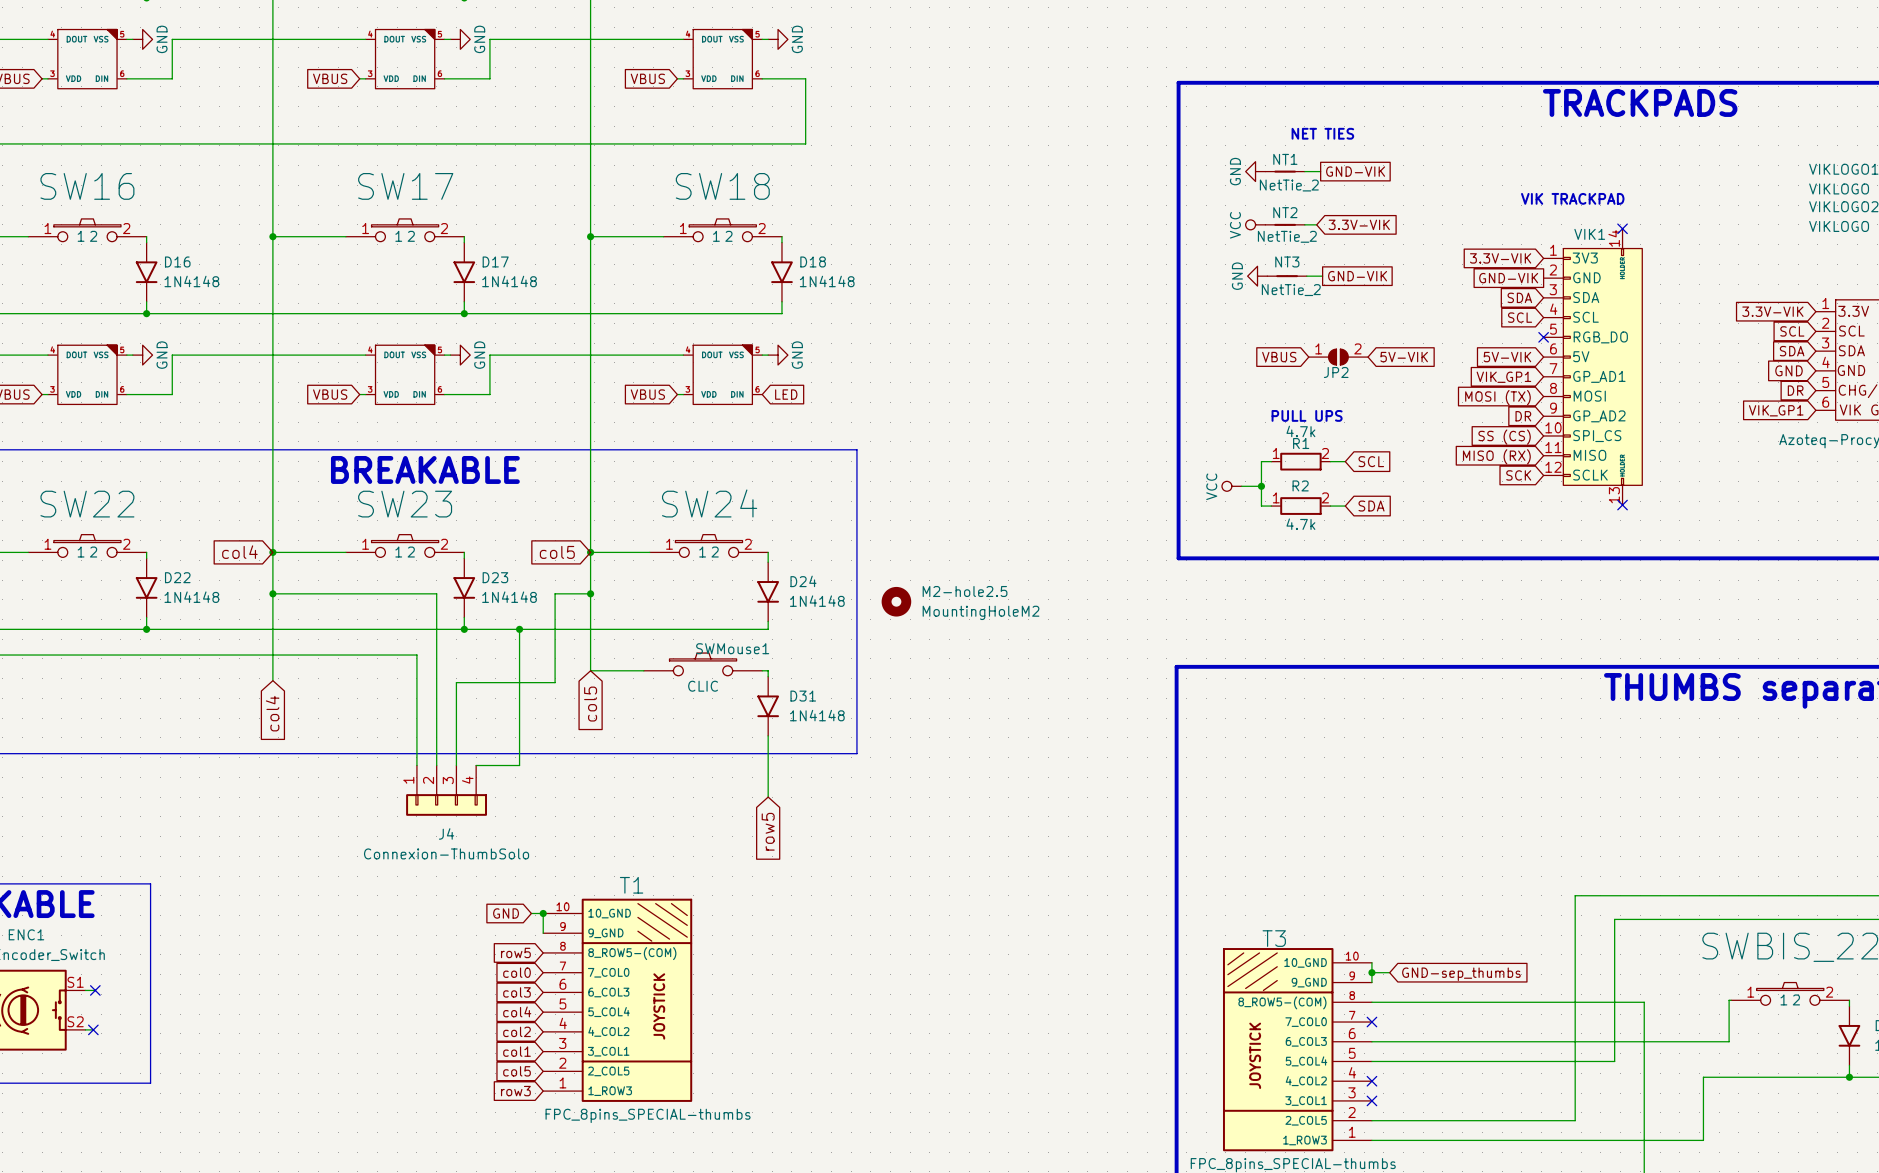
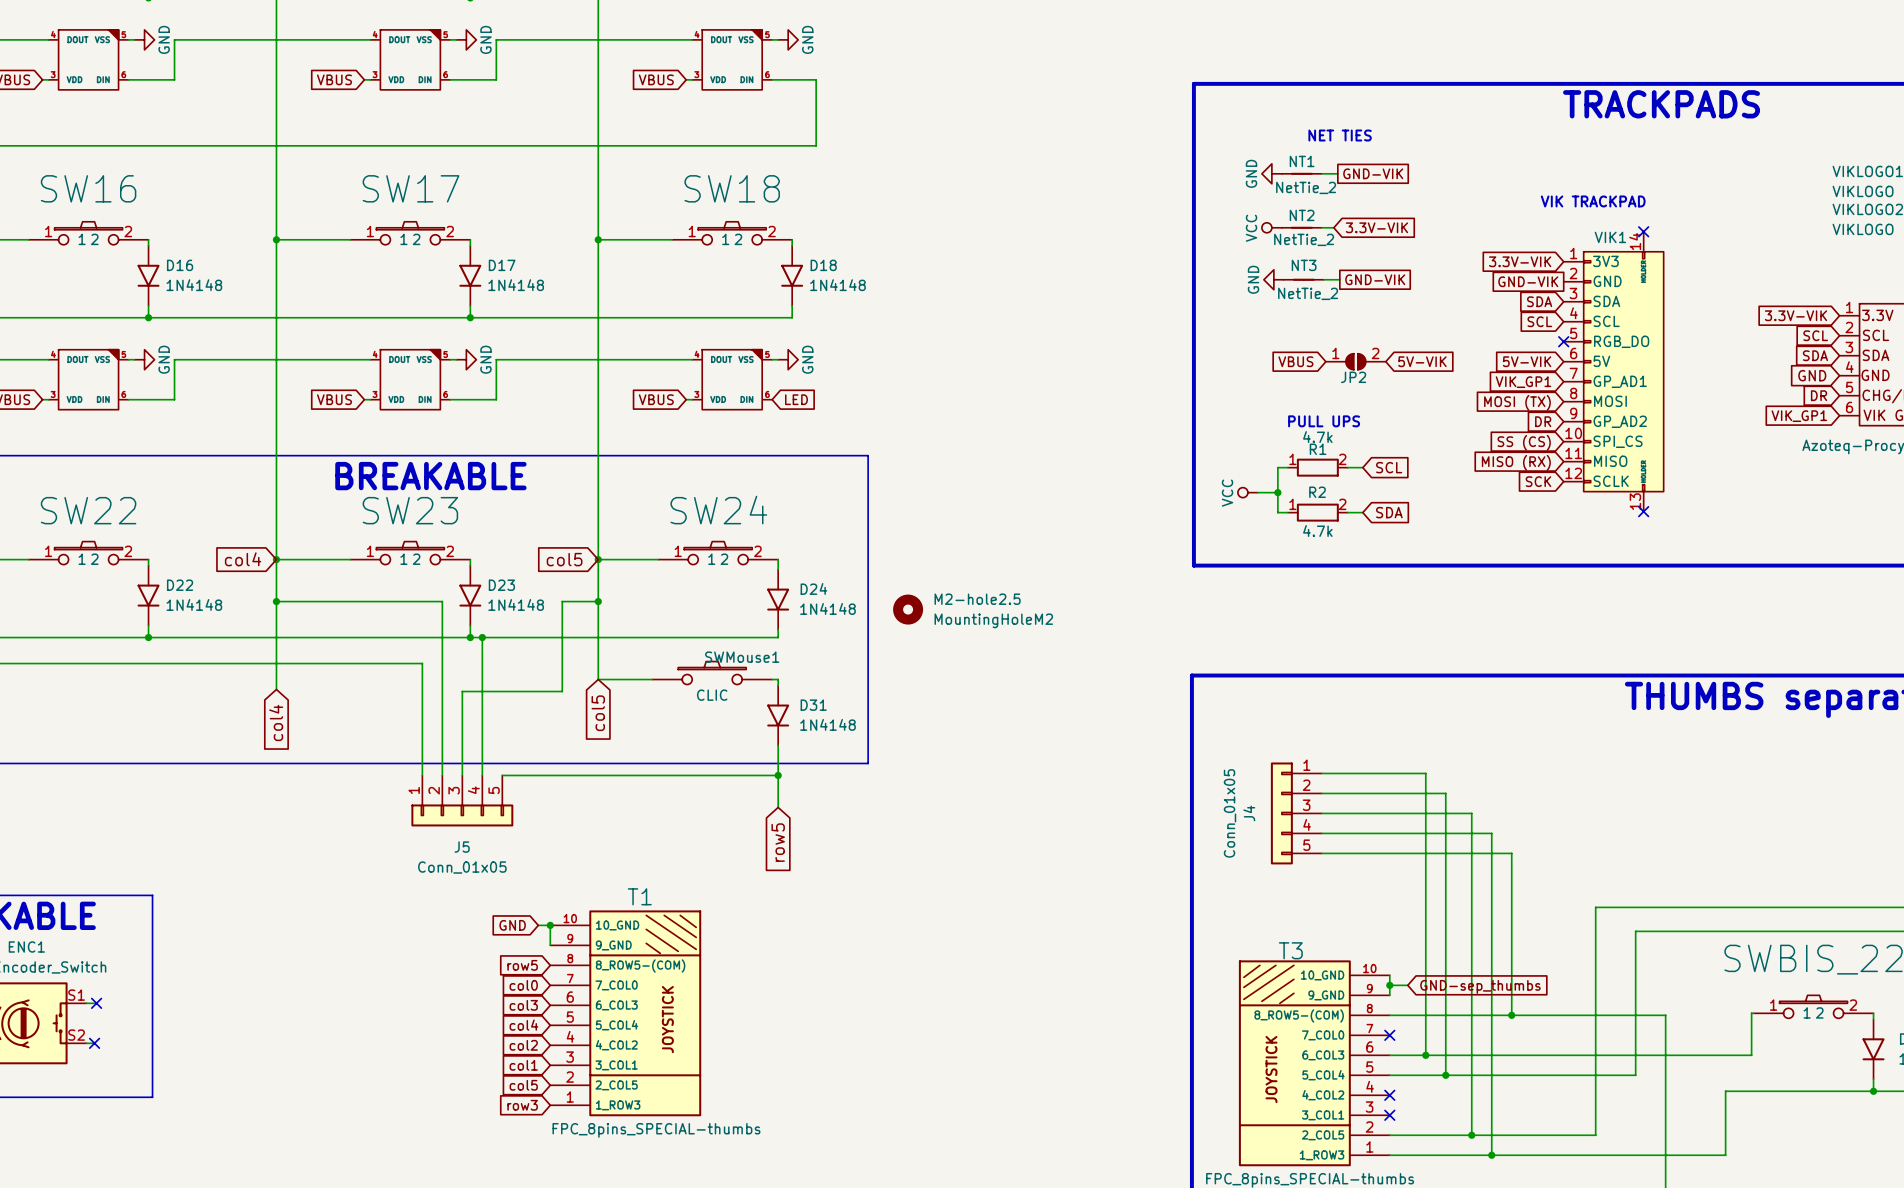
wire: (519, 629) (519, 765) -> (778, 775) (526, 775)
junction position: (519, 629) -> (482, 637)
wire: none -> (1321, 773) (1425, 773) (1425, 1055)
J4 symbol: [406, 765, 487, 816] -> [1270, 762, 1322, 865]
wire: (476, 765) (495, 765) -> (482, 775) (482, 637)
junction: none -> (778, 775)
wire: none -> (1321, 793) (1445, 793) (1445, 1075)
J5: none -> Conn_01x05 (462, 800)
wire: none -> (1321, 813) (1471, 813) (1471, 1135)
wire: none -> (1321, 833) (1491, 833) (1491, 1155)
J4 name position: J4 (446, 833) -> J4 (1249, 813)
wire: none -> (1321, 853) (1511, 853) (1511, 1015)
J4 value: Connexion-ThumbSolo (446, 853) -> Conn_01x05 (1230, 813)
junction: none -> (1511, 1015)
junction: none -> (1425, 1055)
junction: none -> (1445, 1075)
junction: none -> (1471, 1135)
junction: none -> (1491, 1155)

